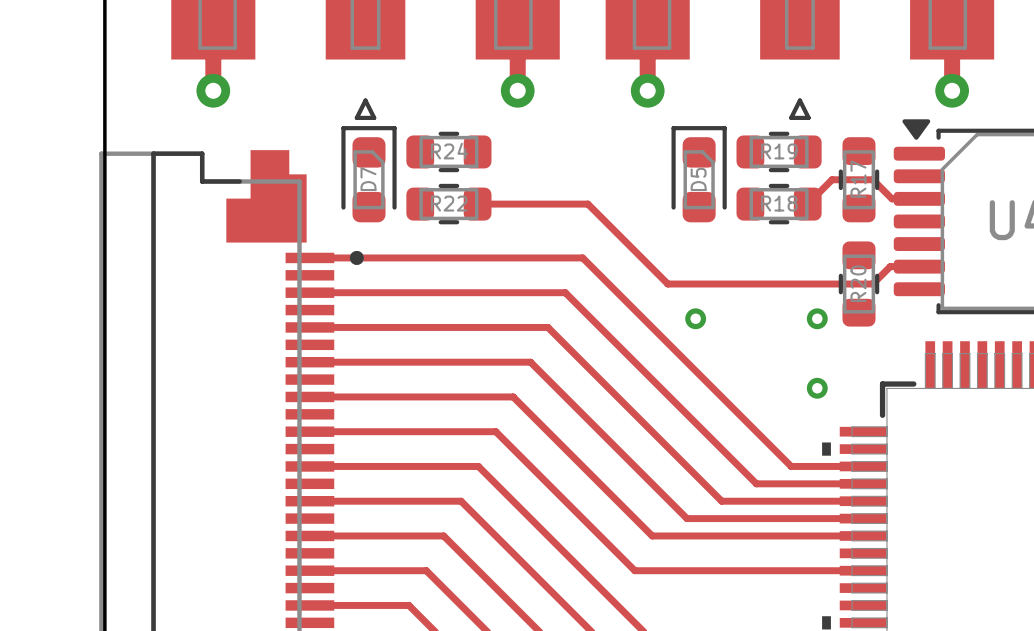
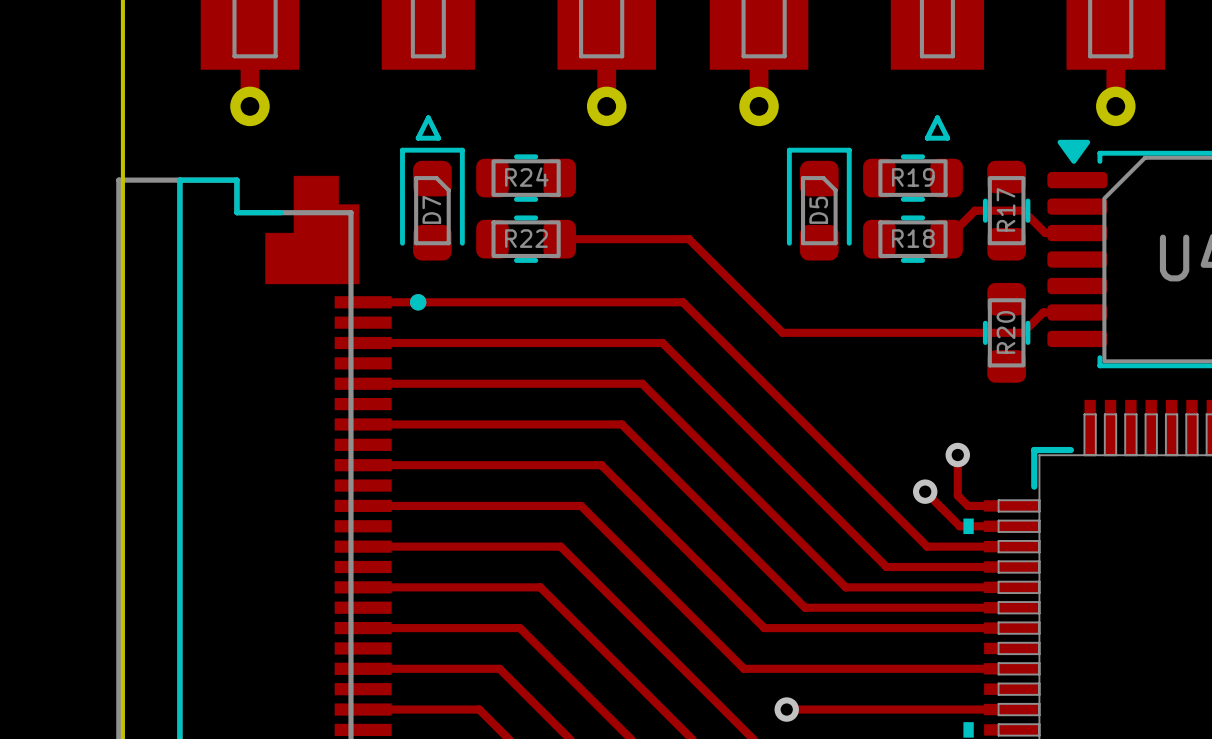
via: (695, 318) -> none
via: (817, 318) -> none
track: none -> (957, 455) (957, 495) (967, 505) (1011, 505)
track: none -> (925, 491) (959, 526) (1011, 526)
via: none -> (925, 491)
track: none -> (786, 709) (1011, 709)
via: none -> (786, 709)

